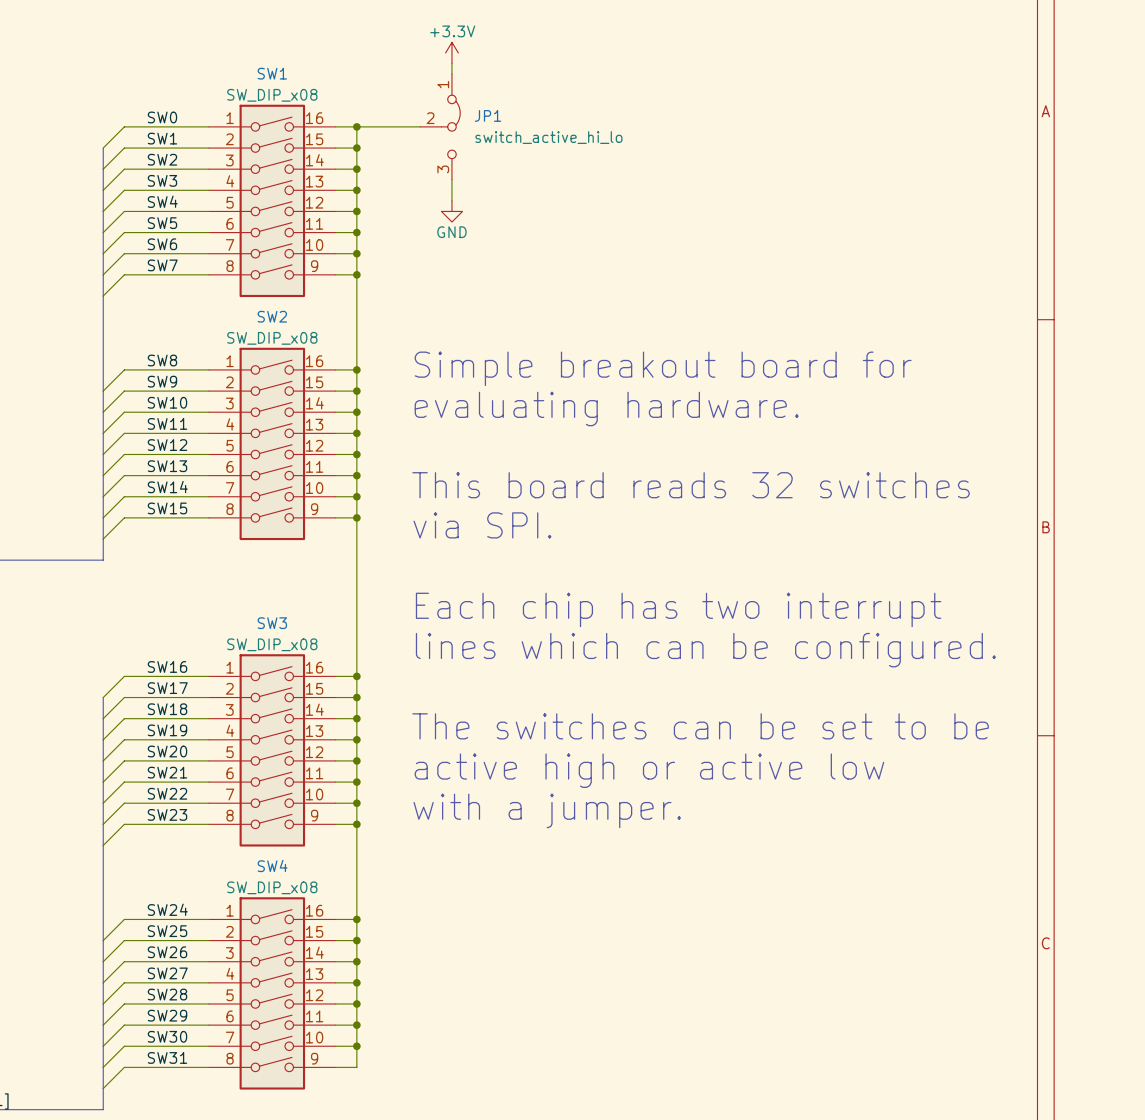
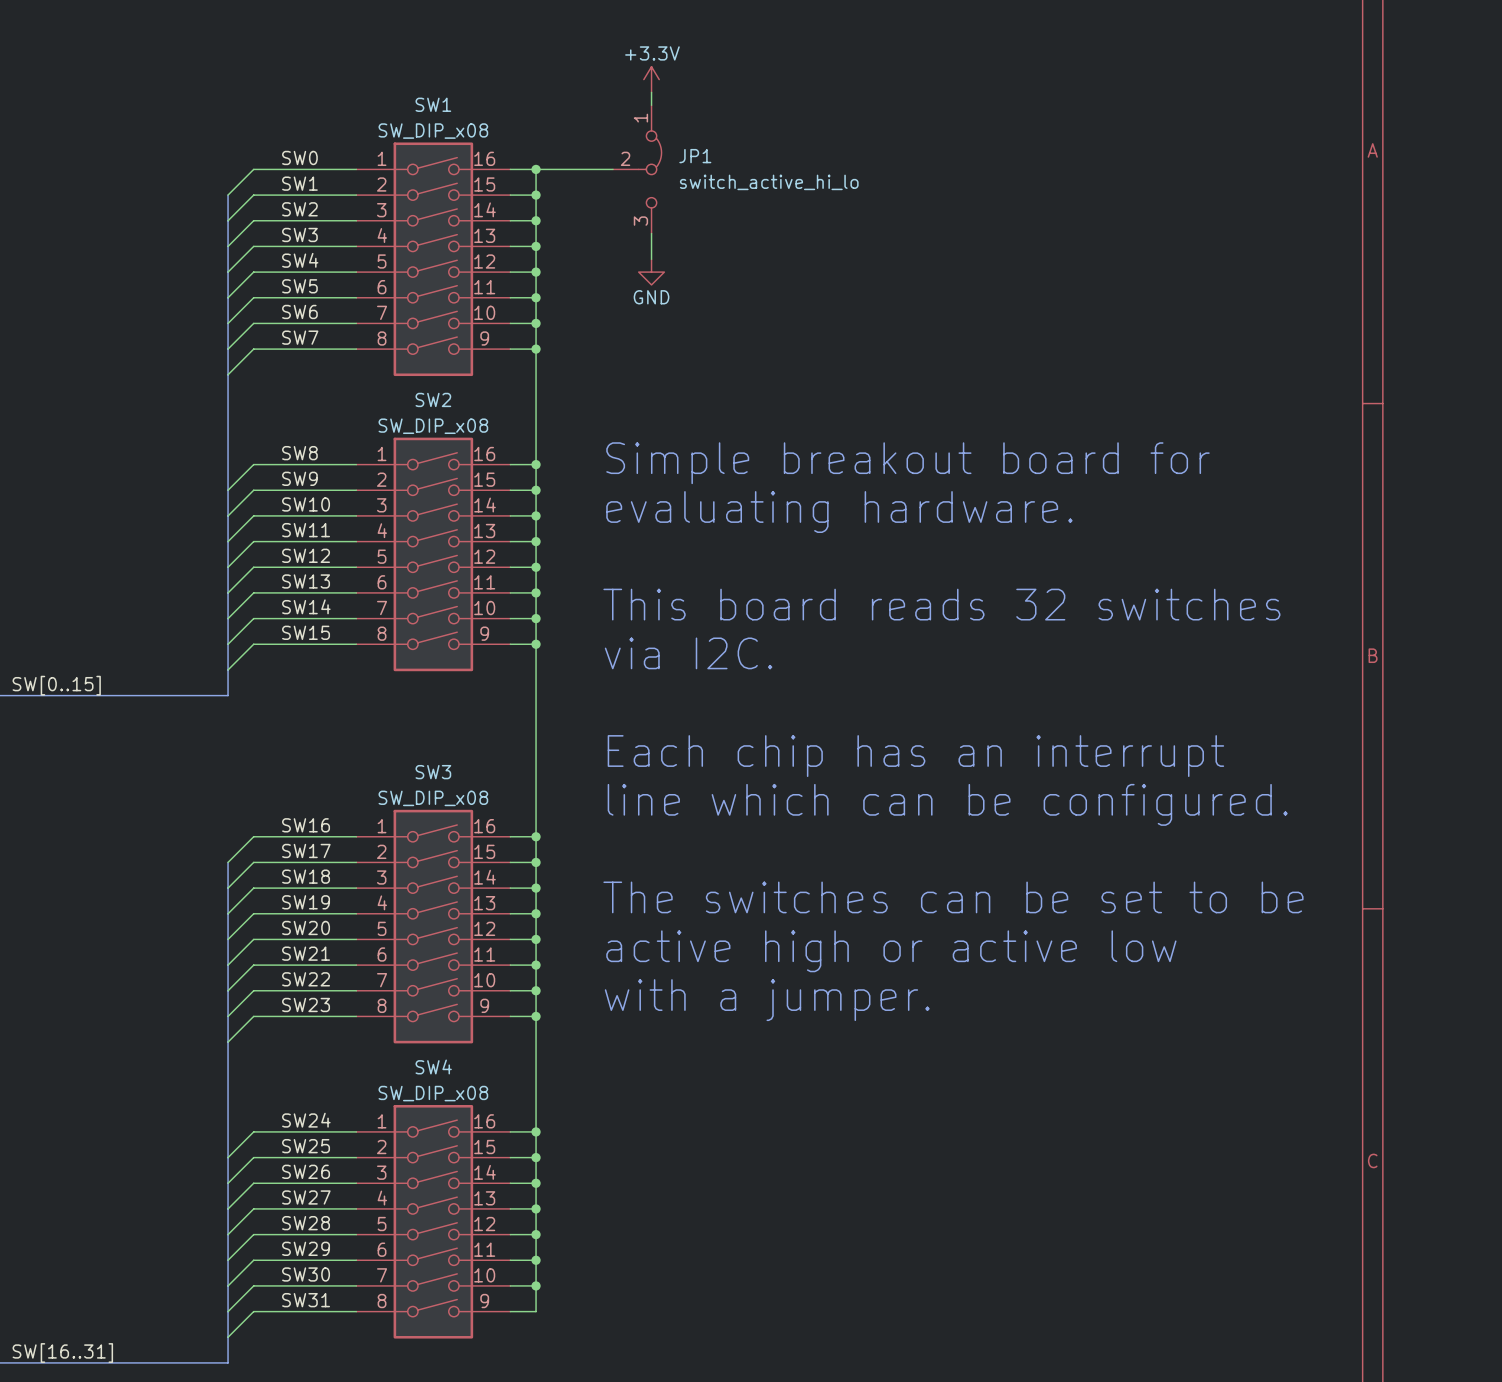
text: via SPI. (482, 525) -> via I2C. (688, 653)
text: Each chip has two interrupt (678, 609) -> Each chip has an interrupt (915, 756)
text: lines which can be configured. (705, 650) -> line which can be configured. (947, 804)

